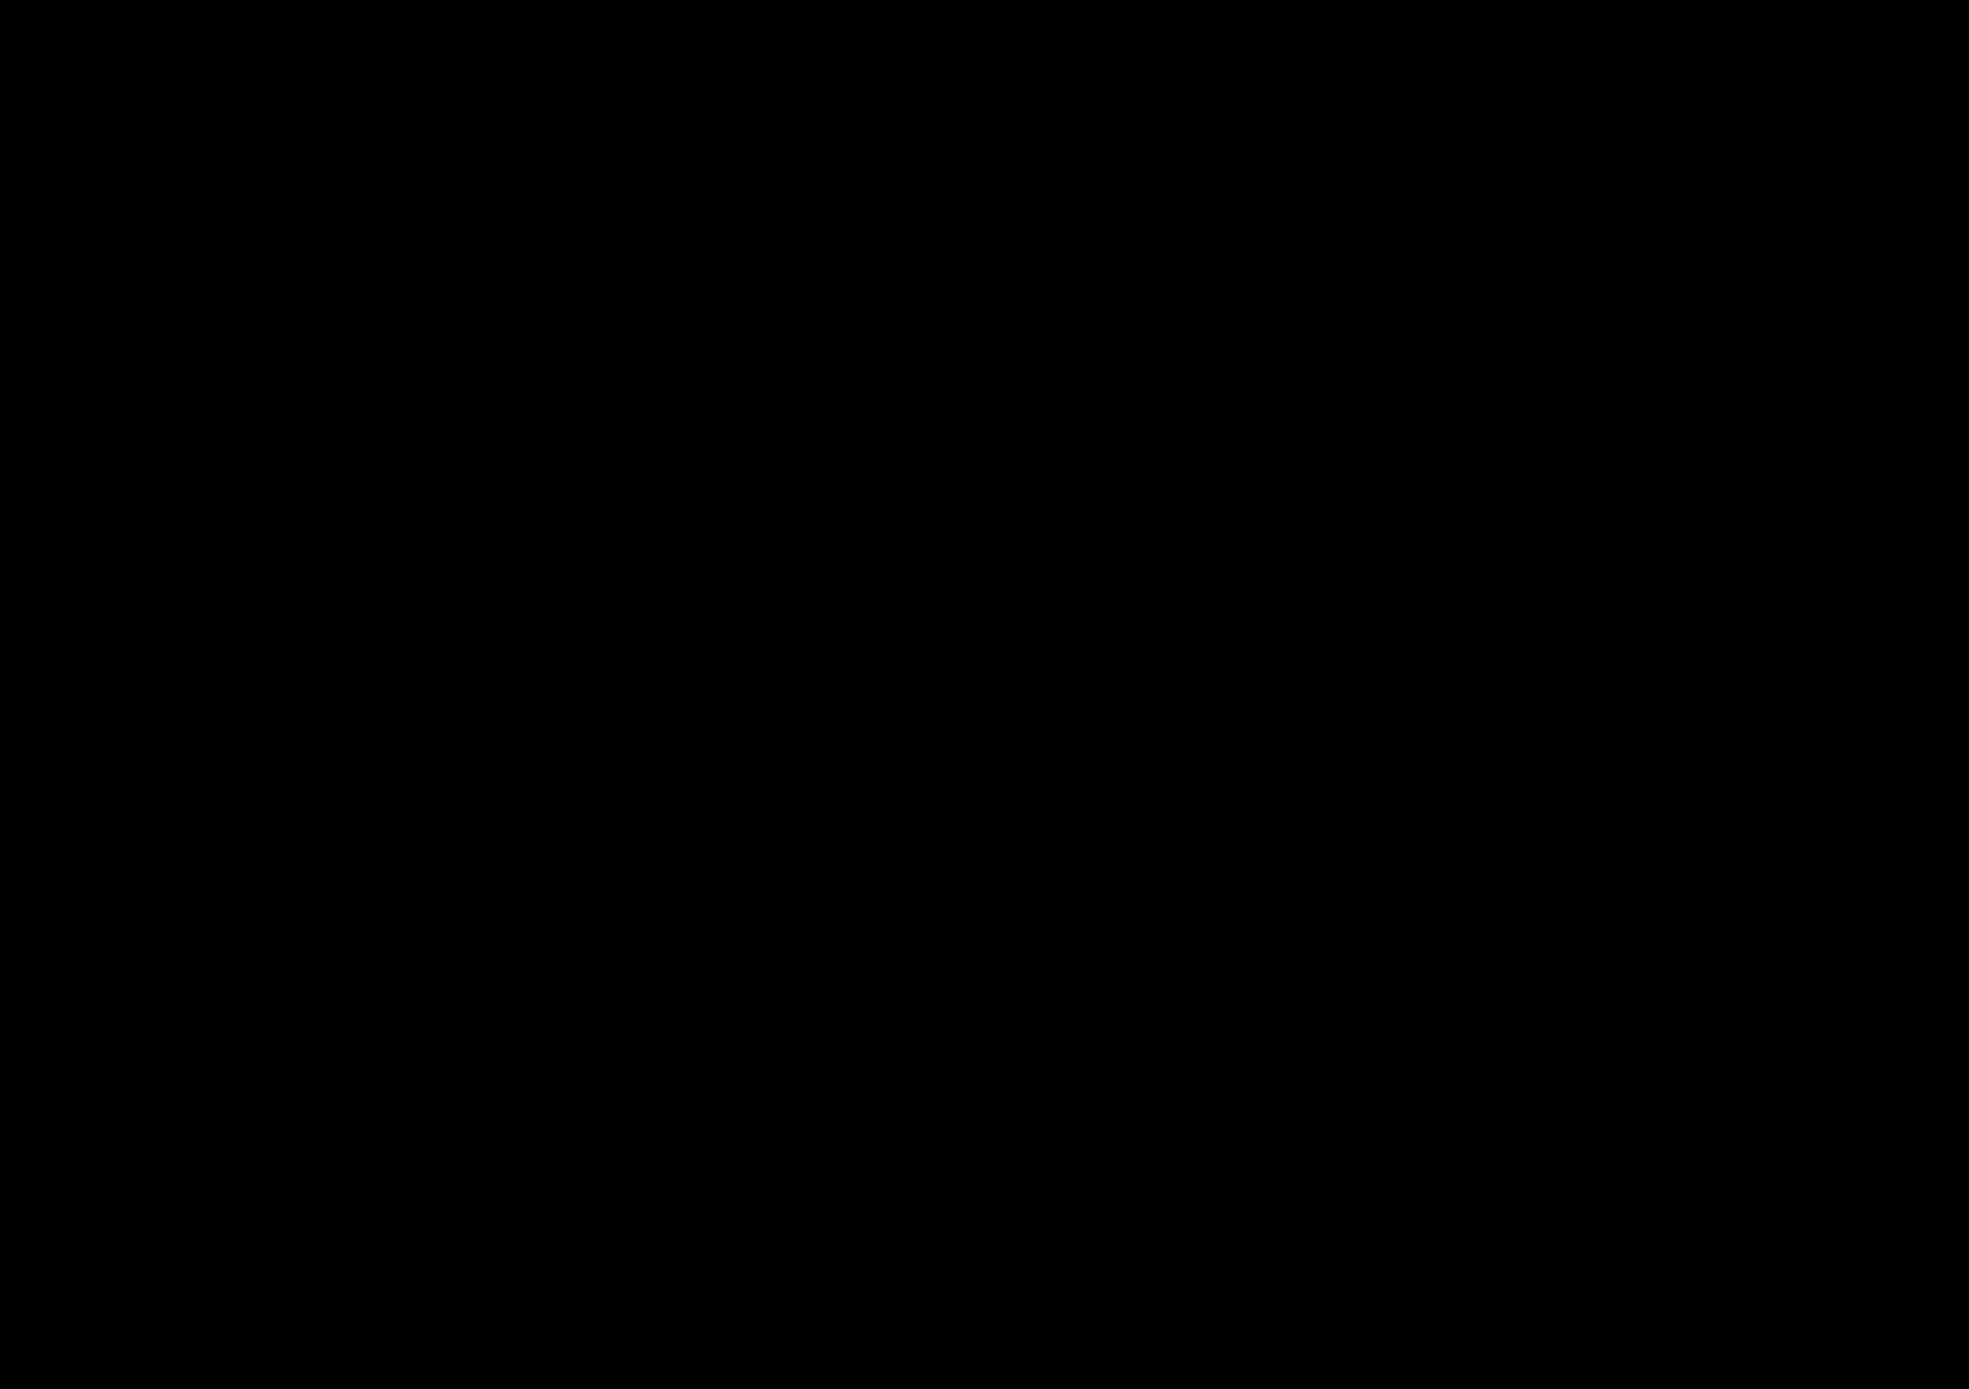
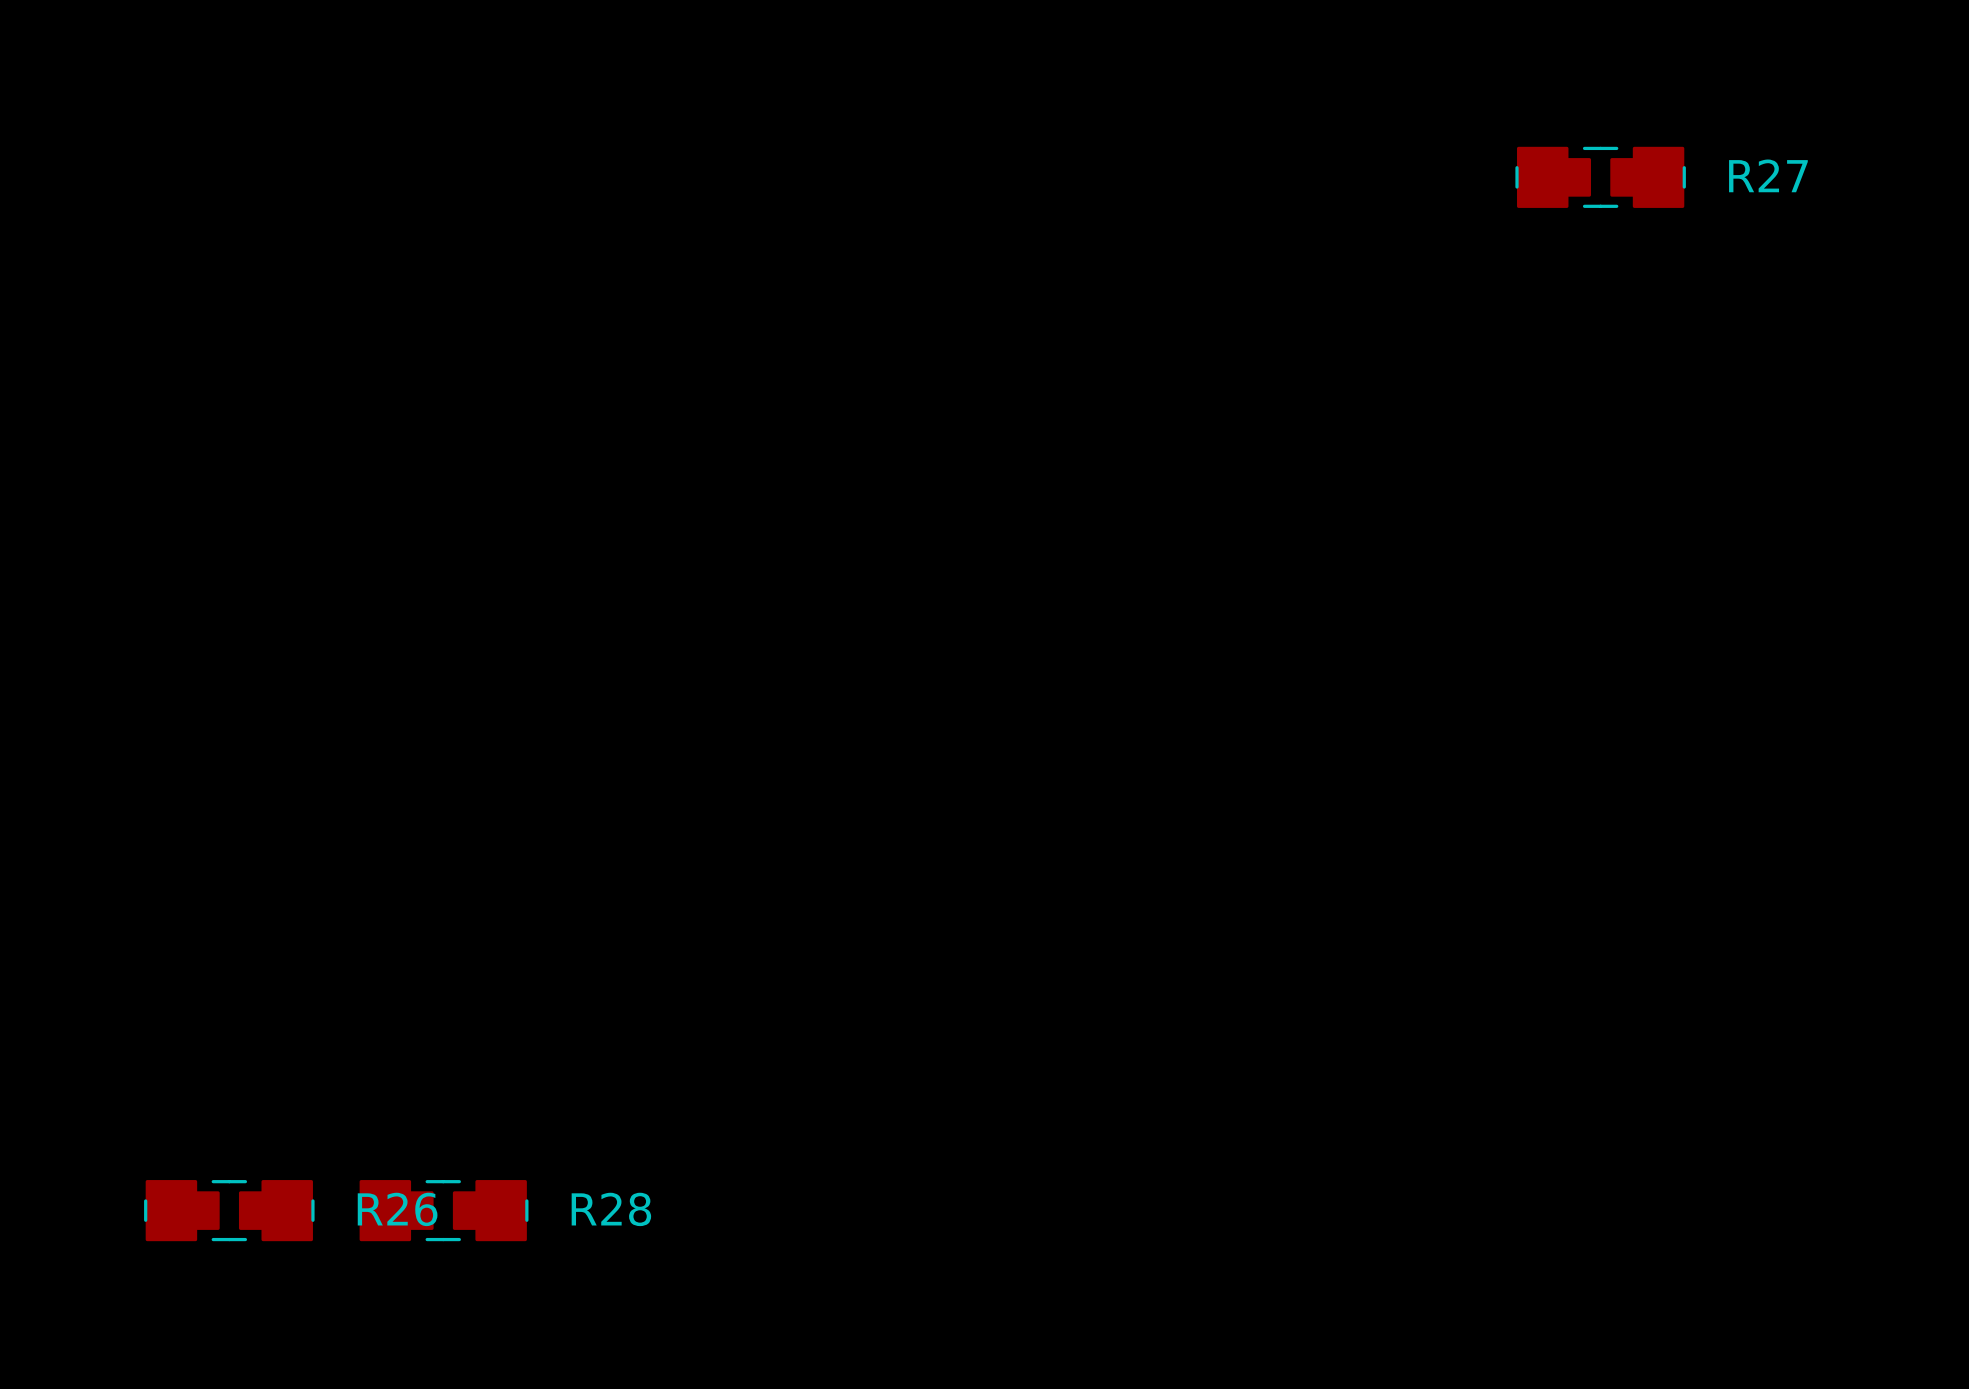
R27: none -> (1600, 177)
R26: none -> (229, 1210)
R28: none -> (443, 1210)

